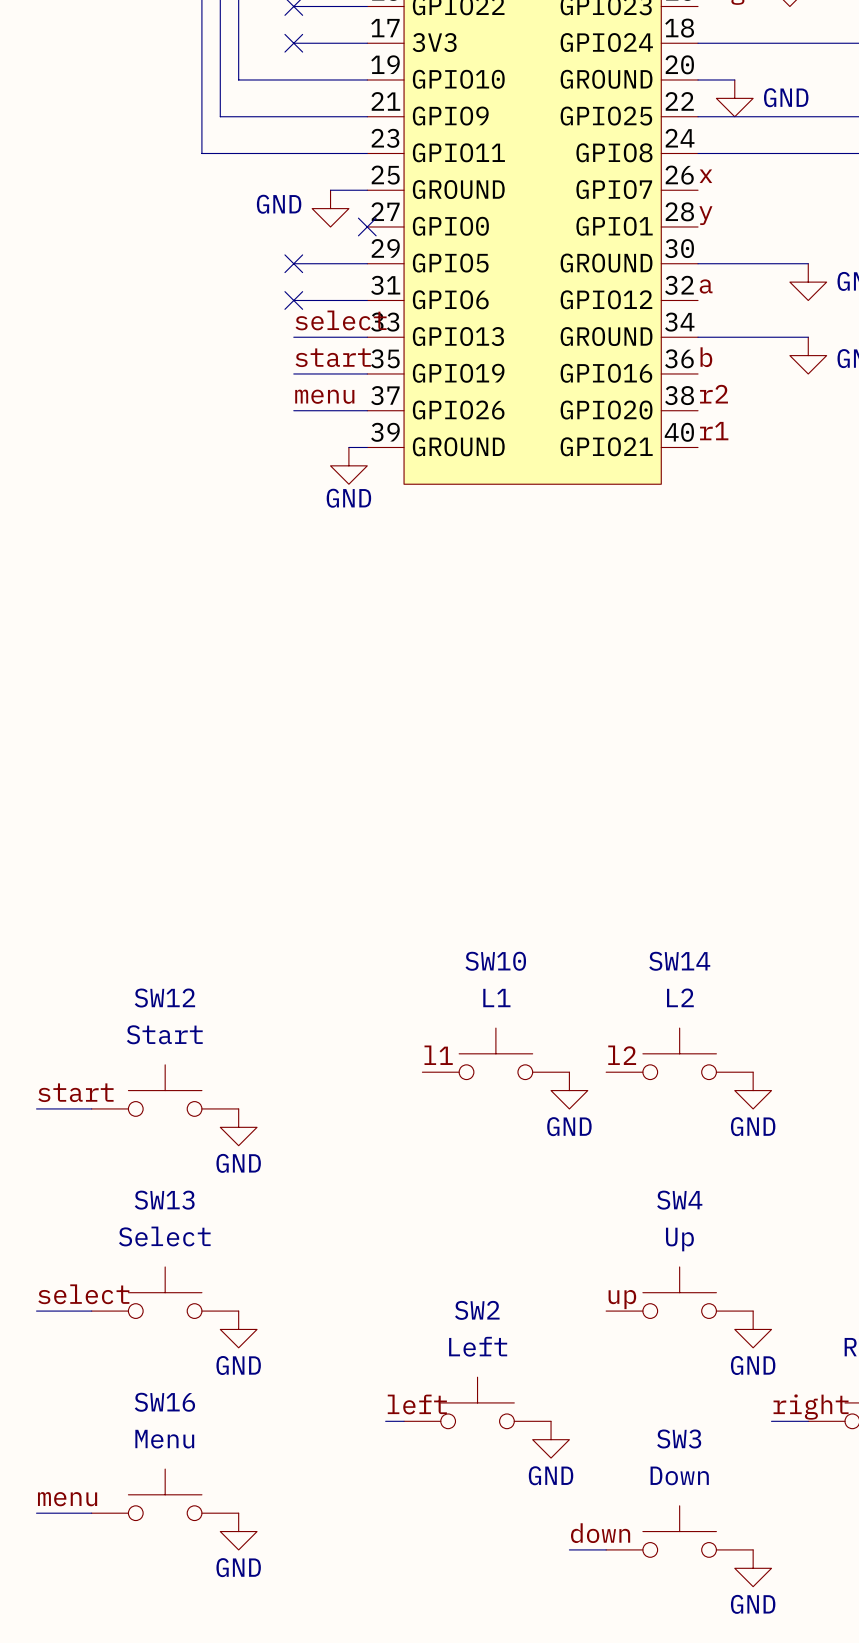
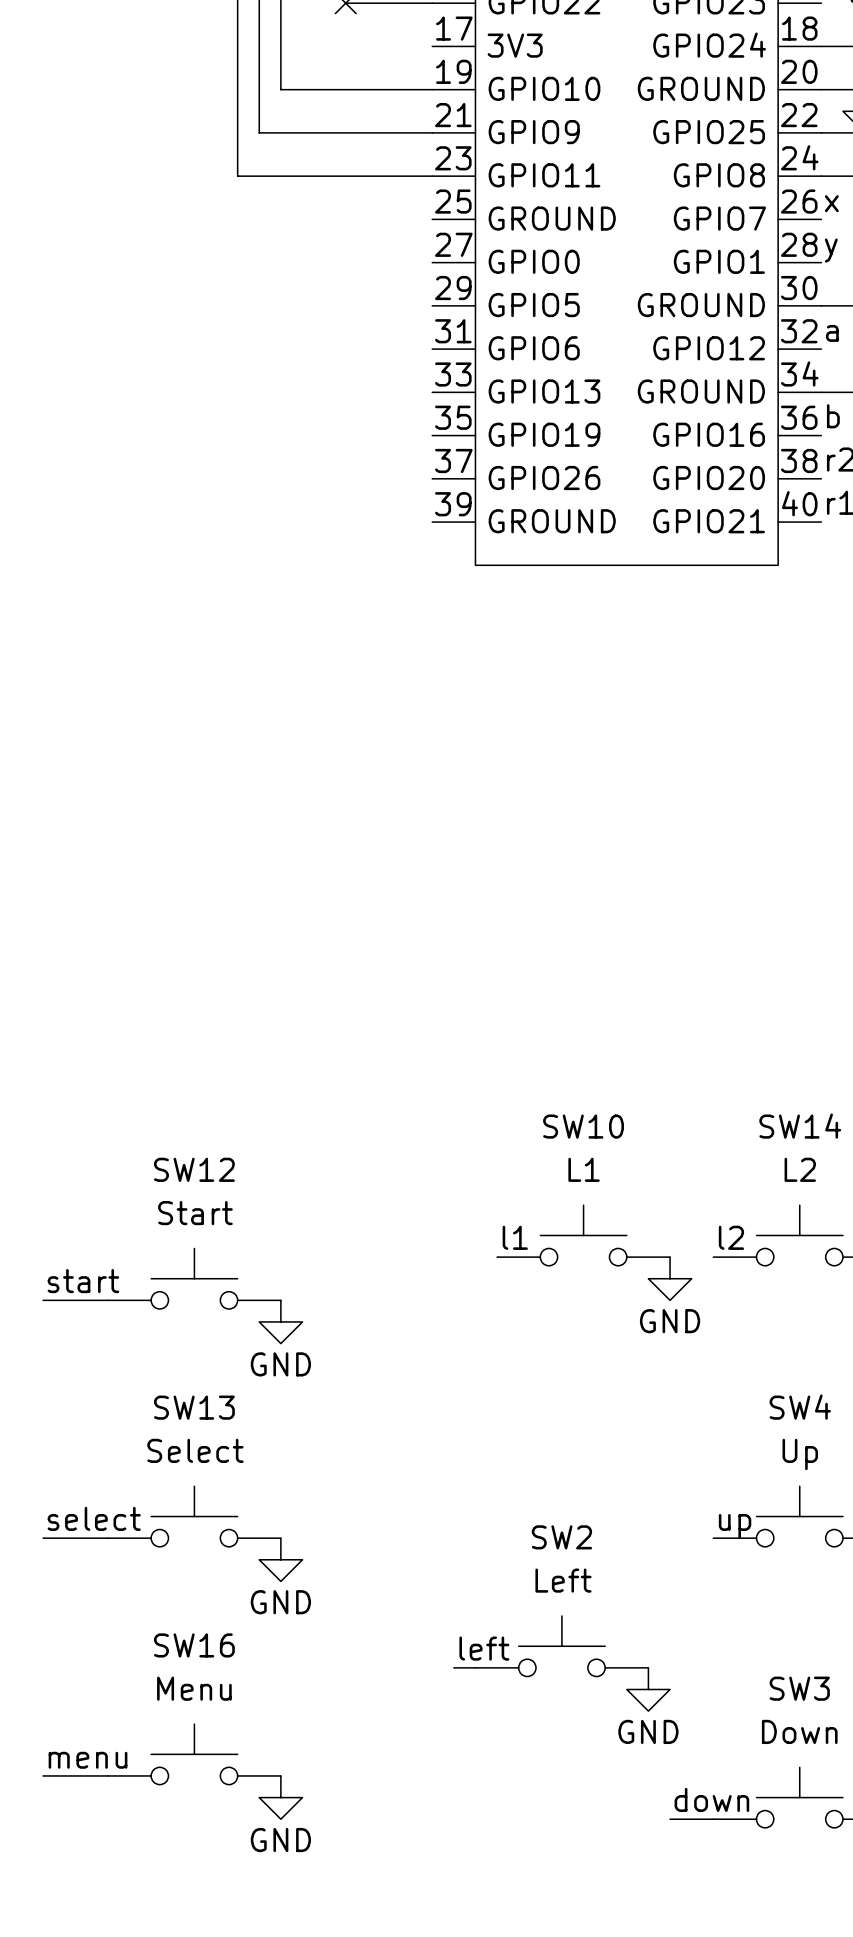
wire: (293, 43) (367, 43) -> none
no-connect mark: (293, 43) -> none
wire: (330, 190) (367, 190) -> none
power symbol: GND (330, 208) -> none
no-connect mark: (367, 226) -> none
wire: (293, 263) (367, 263) -> none
no-connect mark: (293, 263) -> none
wire: (293, 300) (367, 300) -> none
no-connect mark: (293, 300) -> none
label: select (341, 320) -> none
wire: (293, 337) (367, 337) -> none
label: start (333, 357) -> none
wire: (293, 373) (367, 373) -> none
label: menu (324, 396) -> none
wire: (293, 410) (367, 410) -> none
wire: (348, 447) (367, 447) -> none
power symbol: GND (348, 465) -> none

